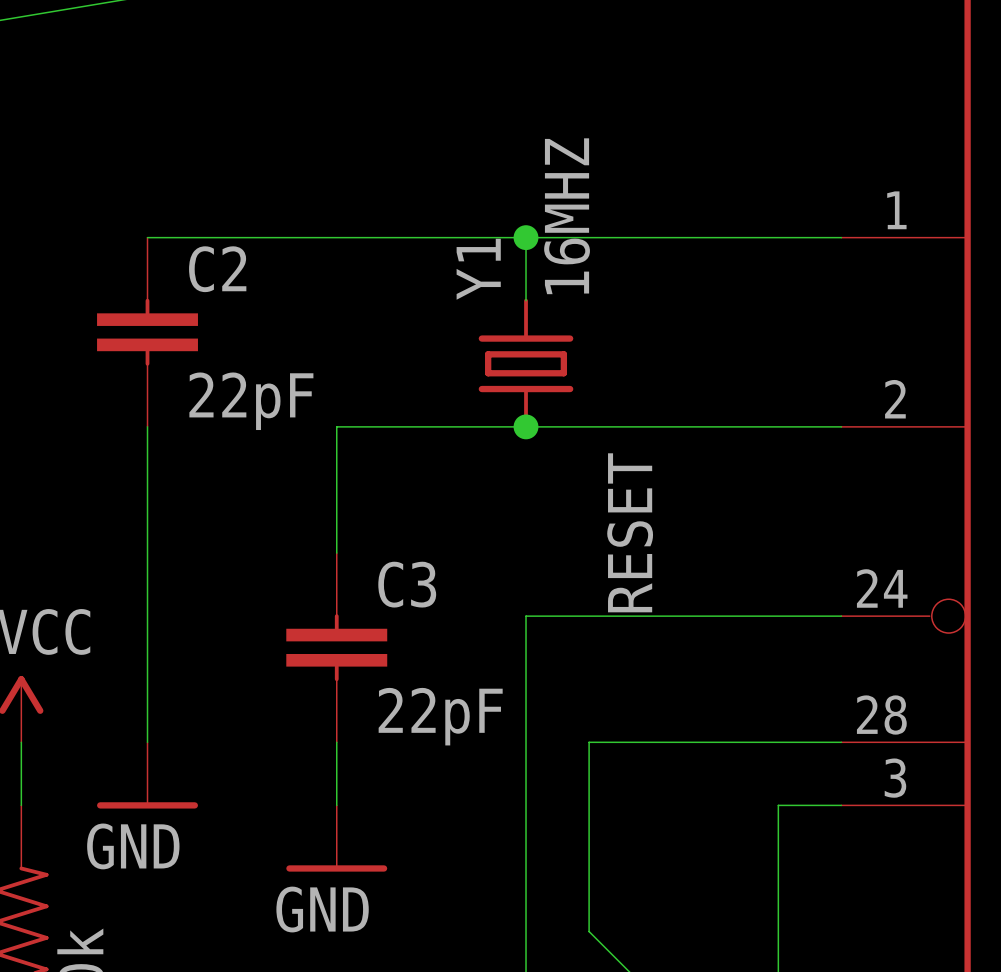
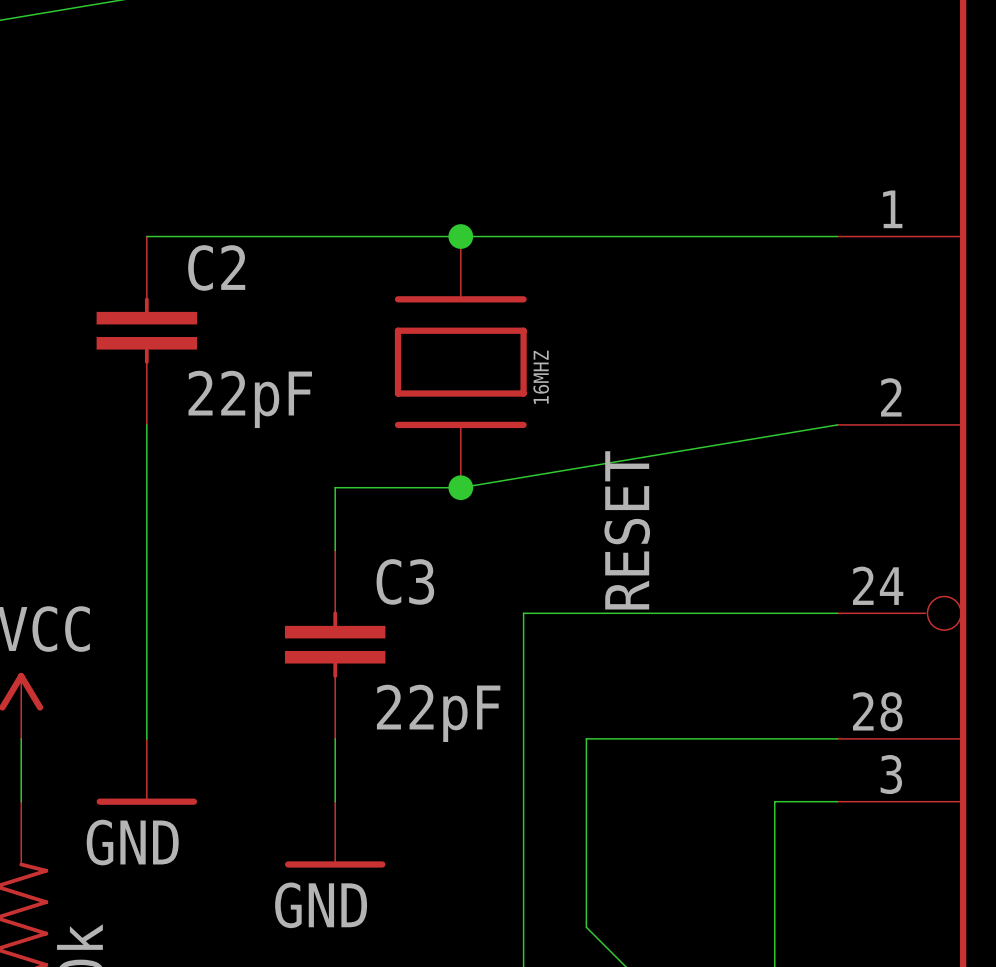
wire: (526, 237) (526, 300) -> none
junction position: (526, 237) -> (460, 236)
part: none -> 16MHZ (460, 362)
Y1: 16MHZ (526, 363) -> none
junction position: (526, 426) -> (460, 487)
wire: (841, 426) (336, 426) (336, 489) -> (837, 424) (460, 487) (335, 487)

